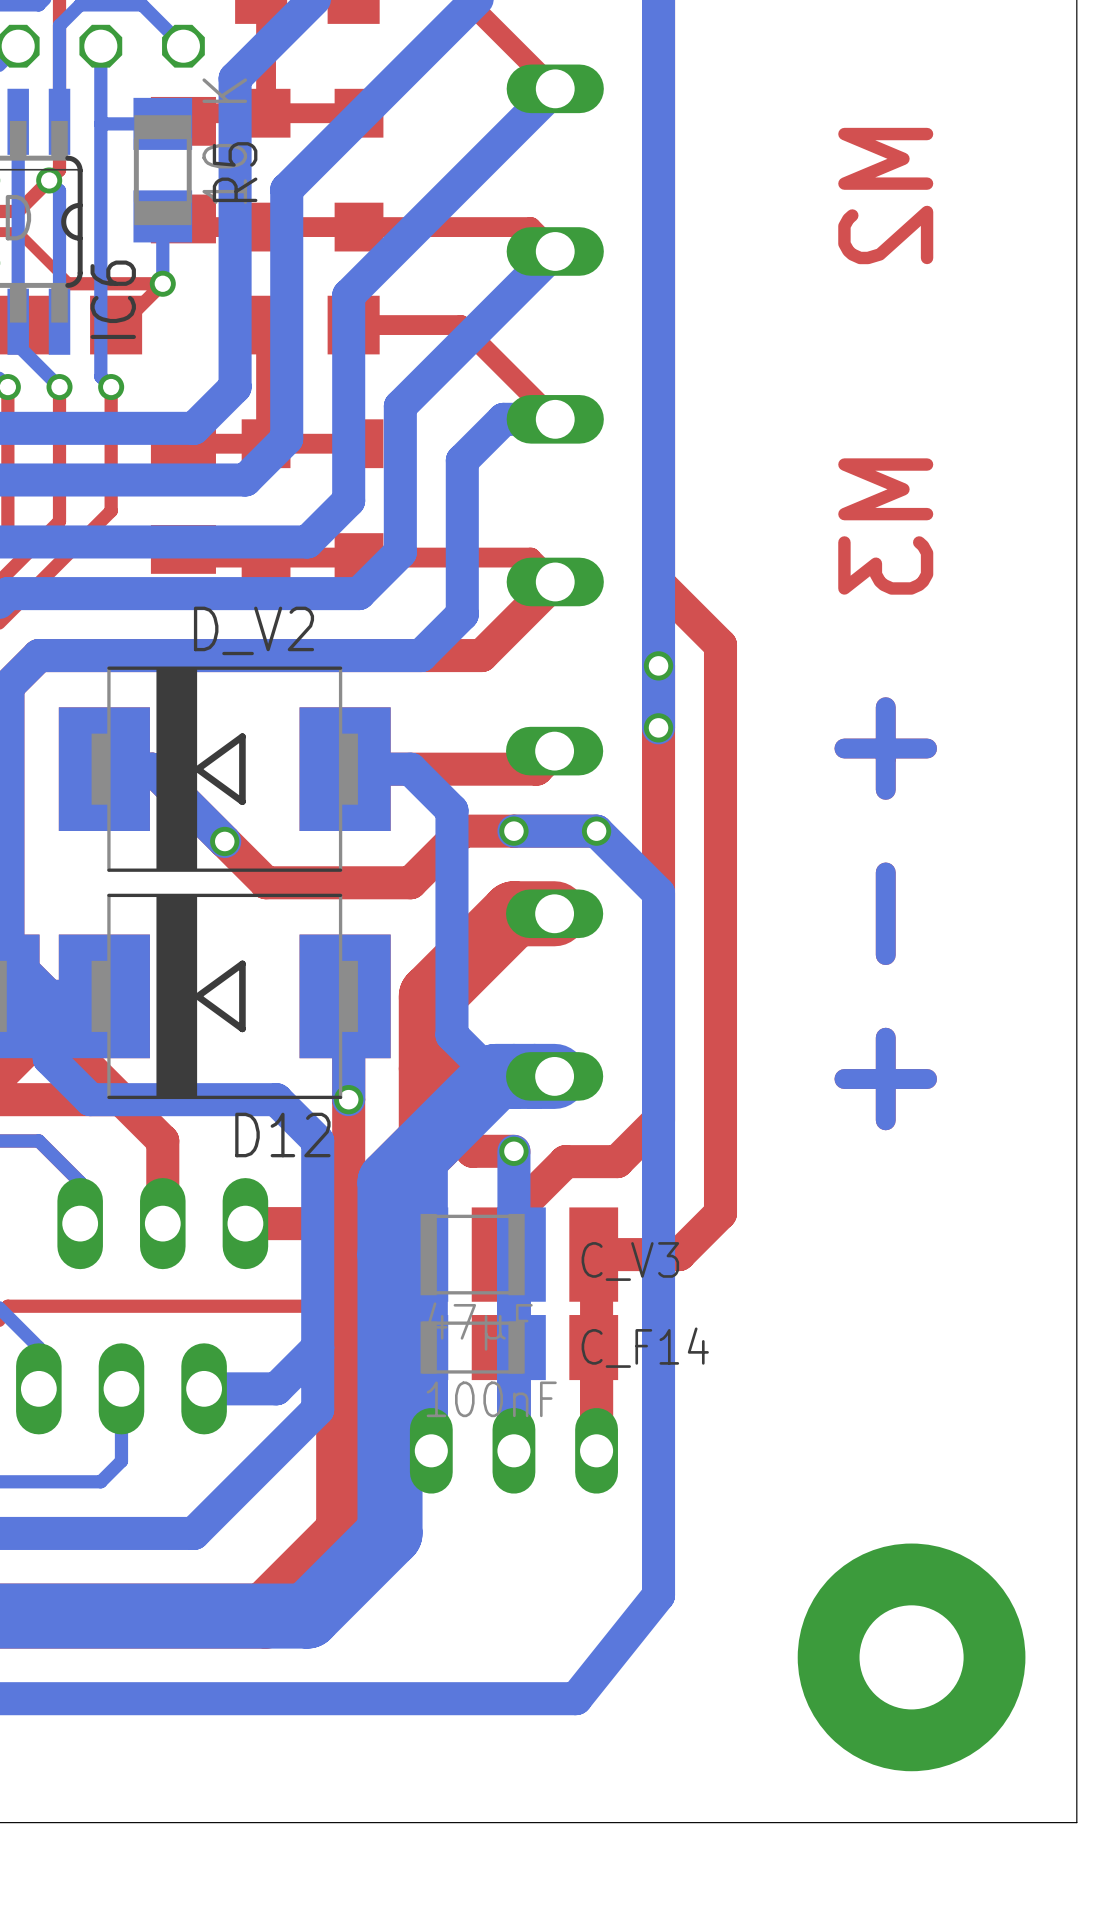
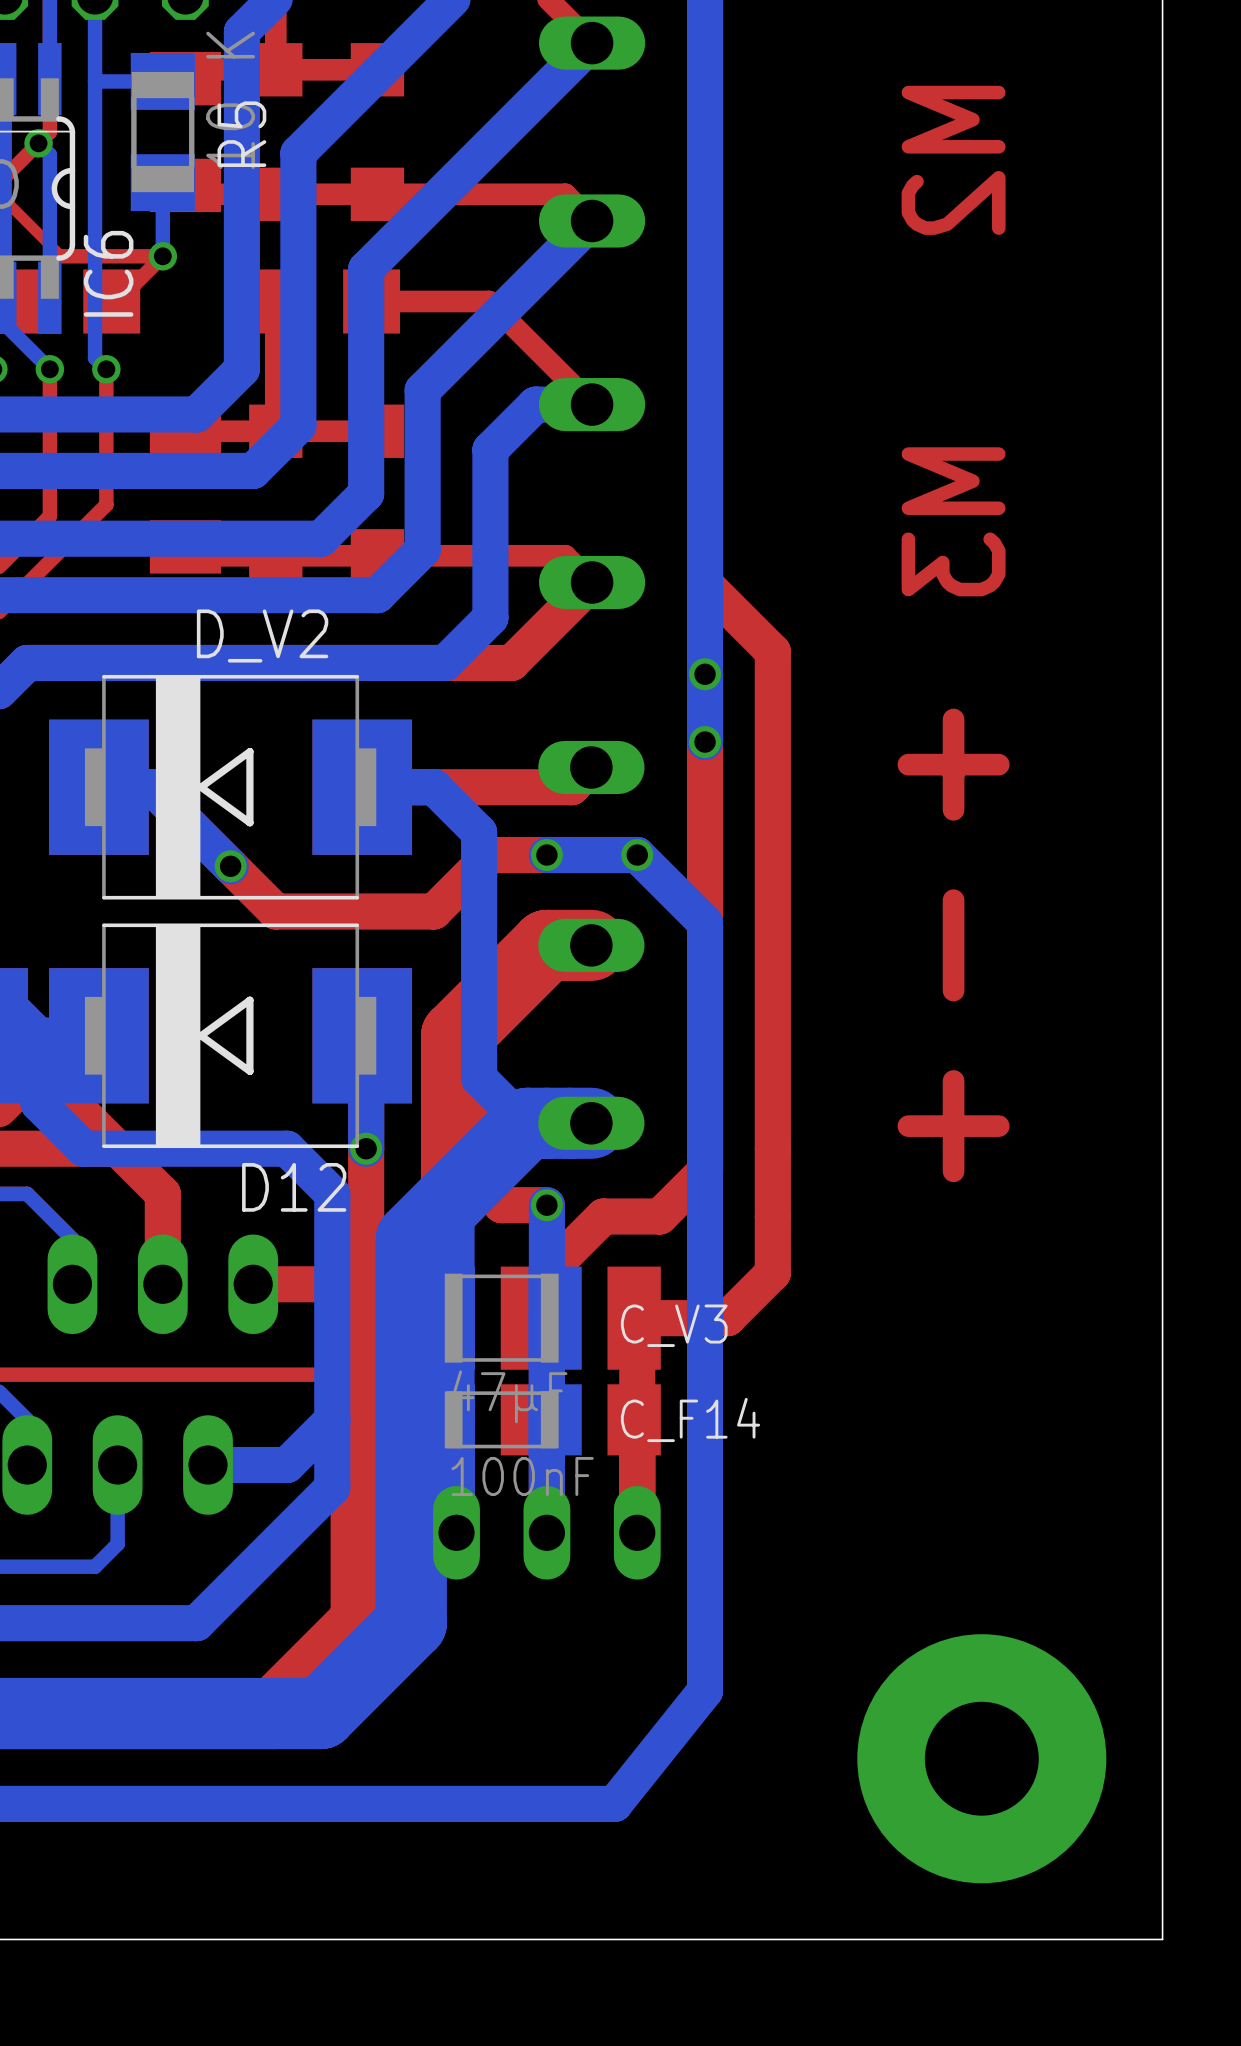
bottom track: (885, 707) (885, 789) -> none
bottom track: (927, 748) (844, 748) -> none
bottom track: (885, 872) (885, 955) -> none
bottom track: (885, 1037) (885, 1120) -> none
bottom track: (927, 1079) (844, 1079) -> none

